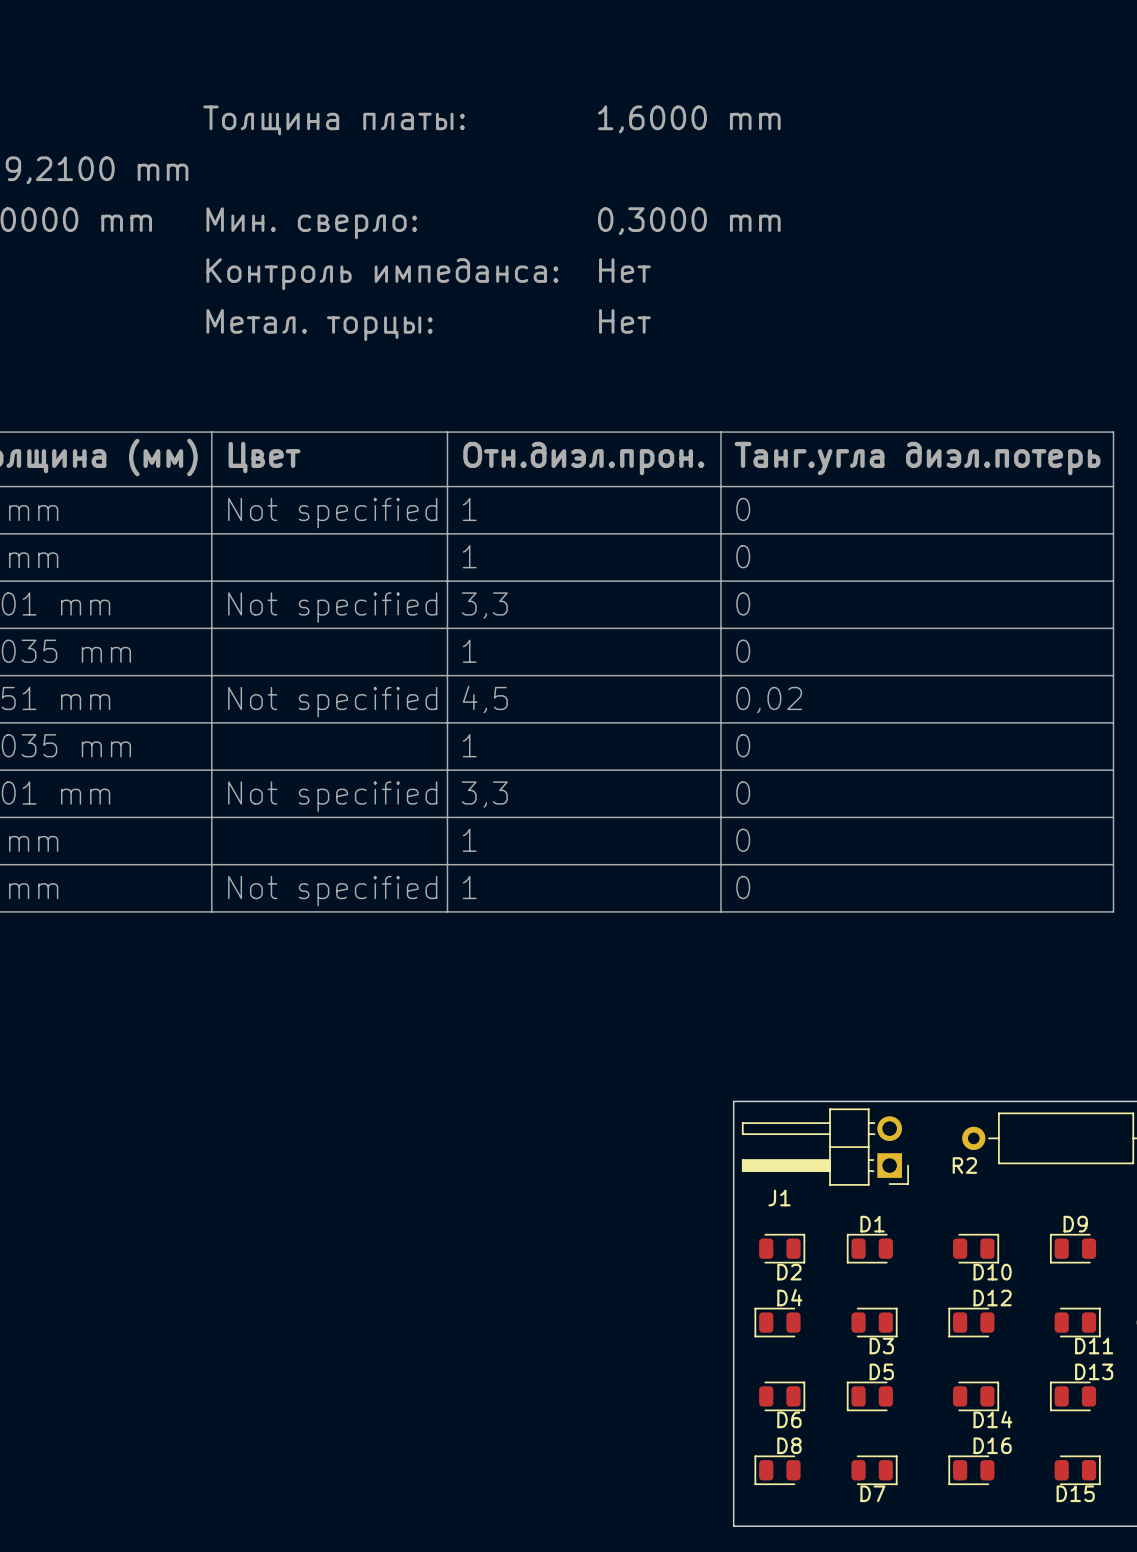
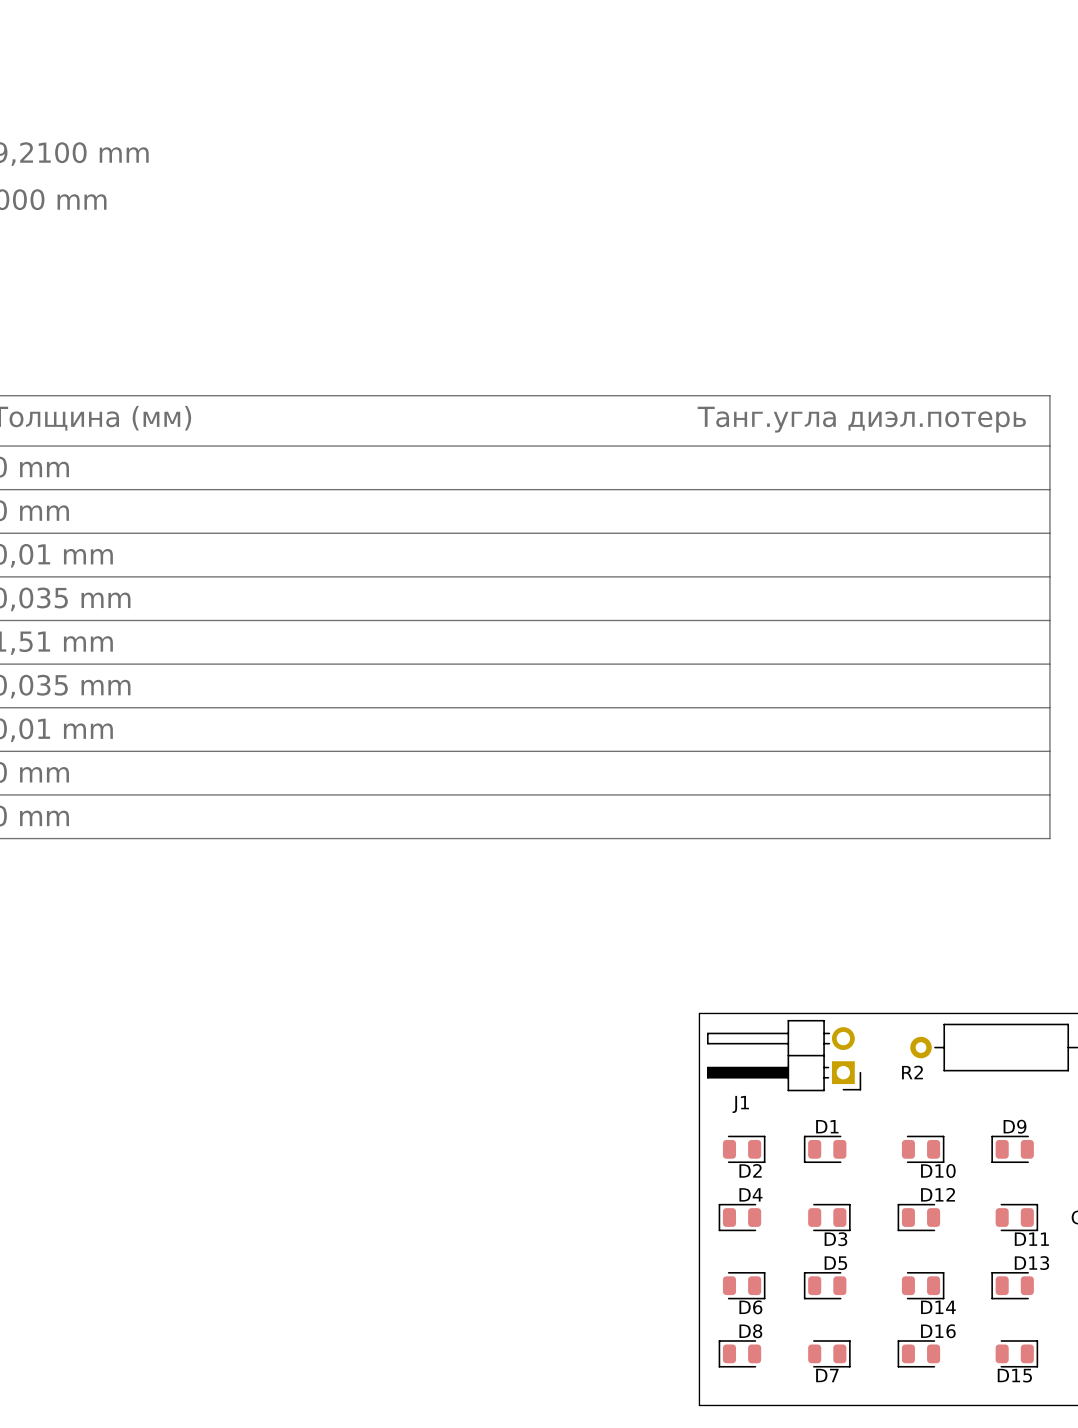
text: 1,6000 mm (689, 119) -> none
text: Толщина платы: (334, 120) -> none
text: 0,3000 mm (689, 221) -> none
text: Мин. сверло: (311, 223) -> none
text: Нет (624, 270) -> none
text: Контроль импеданса: (382, 274) -> none
text: Нет (624, 321) -> none
text: Метал. торцы: (319, 325) -> none
line: (211, 432) (211, 911) -> none
line: (447, 432) (447, 911) -> none
line: (720, 432) (720, 911) -> none
text: Цвет (264, 457) -> none
text: Отн.диэл.прон. (583, 458) -> none
text: 1 (469, 509) -> none
text: 0 (743, 509) -> none
text: Not specified (332, 513) -> none
text: 1 (469, 556) -> none
text: 0 (743, 556) -> none
text: 0 (743, 603) -> none
text: 3,3 (484, 605) -> none
text: Not specified (332, 607) -> none
text: 1 (469, 651) -> none
text: 0 (743, 651) -> none
text: 4,5 (485, 699) -> none
text: 0,02 (769, 700) -> none
text: Not specified (332, 702) -> none
text: 1 (469, 745) -> none
text: 0 (743, 745) -> none
text: 0 (743, 793) -> none
text: 3,3 (484, 794) -> none
text: Not specified (332, 796) -> none
text: 1 (469, 840) -> none
text: 0 (743, 840) -> none
text: 1 (469, 887) -> none
text: 0 (743, 887) -> none
text: Not specified (332, 891) -> none

